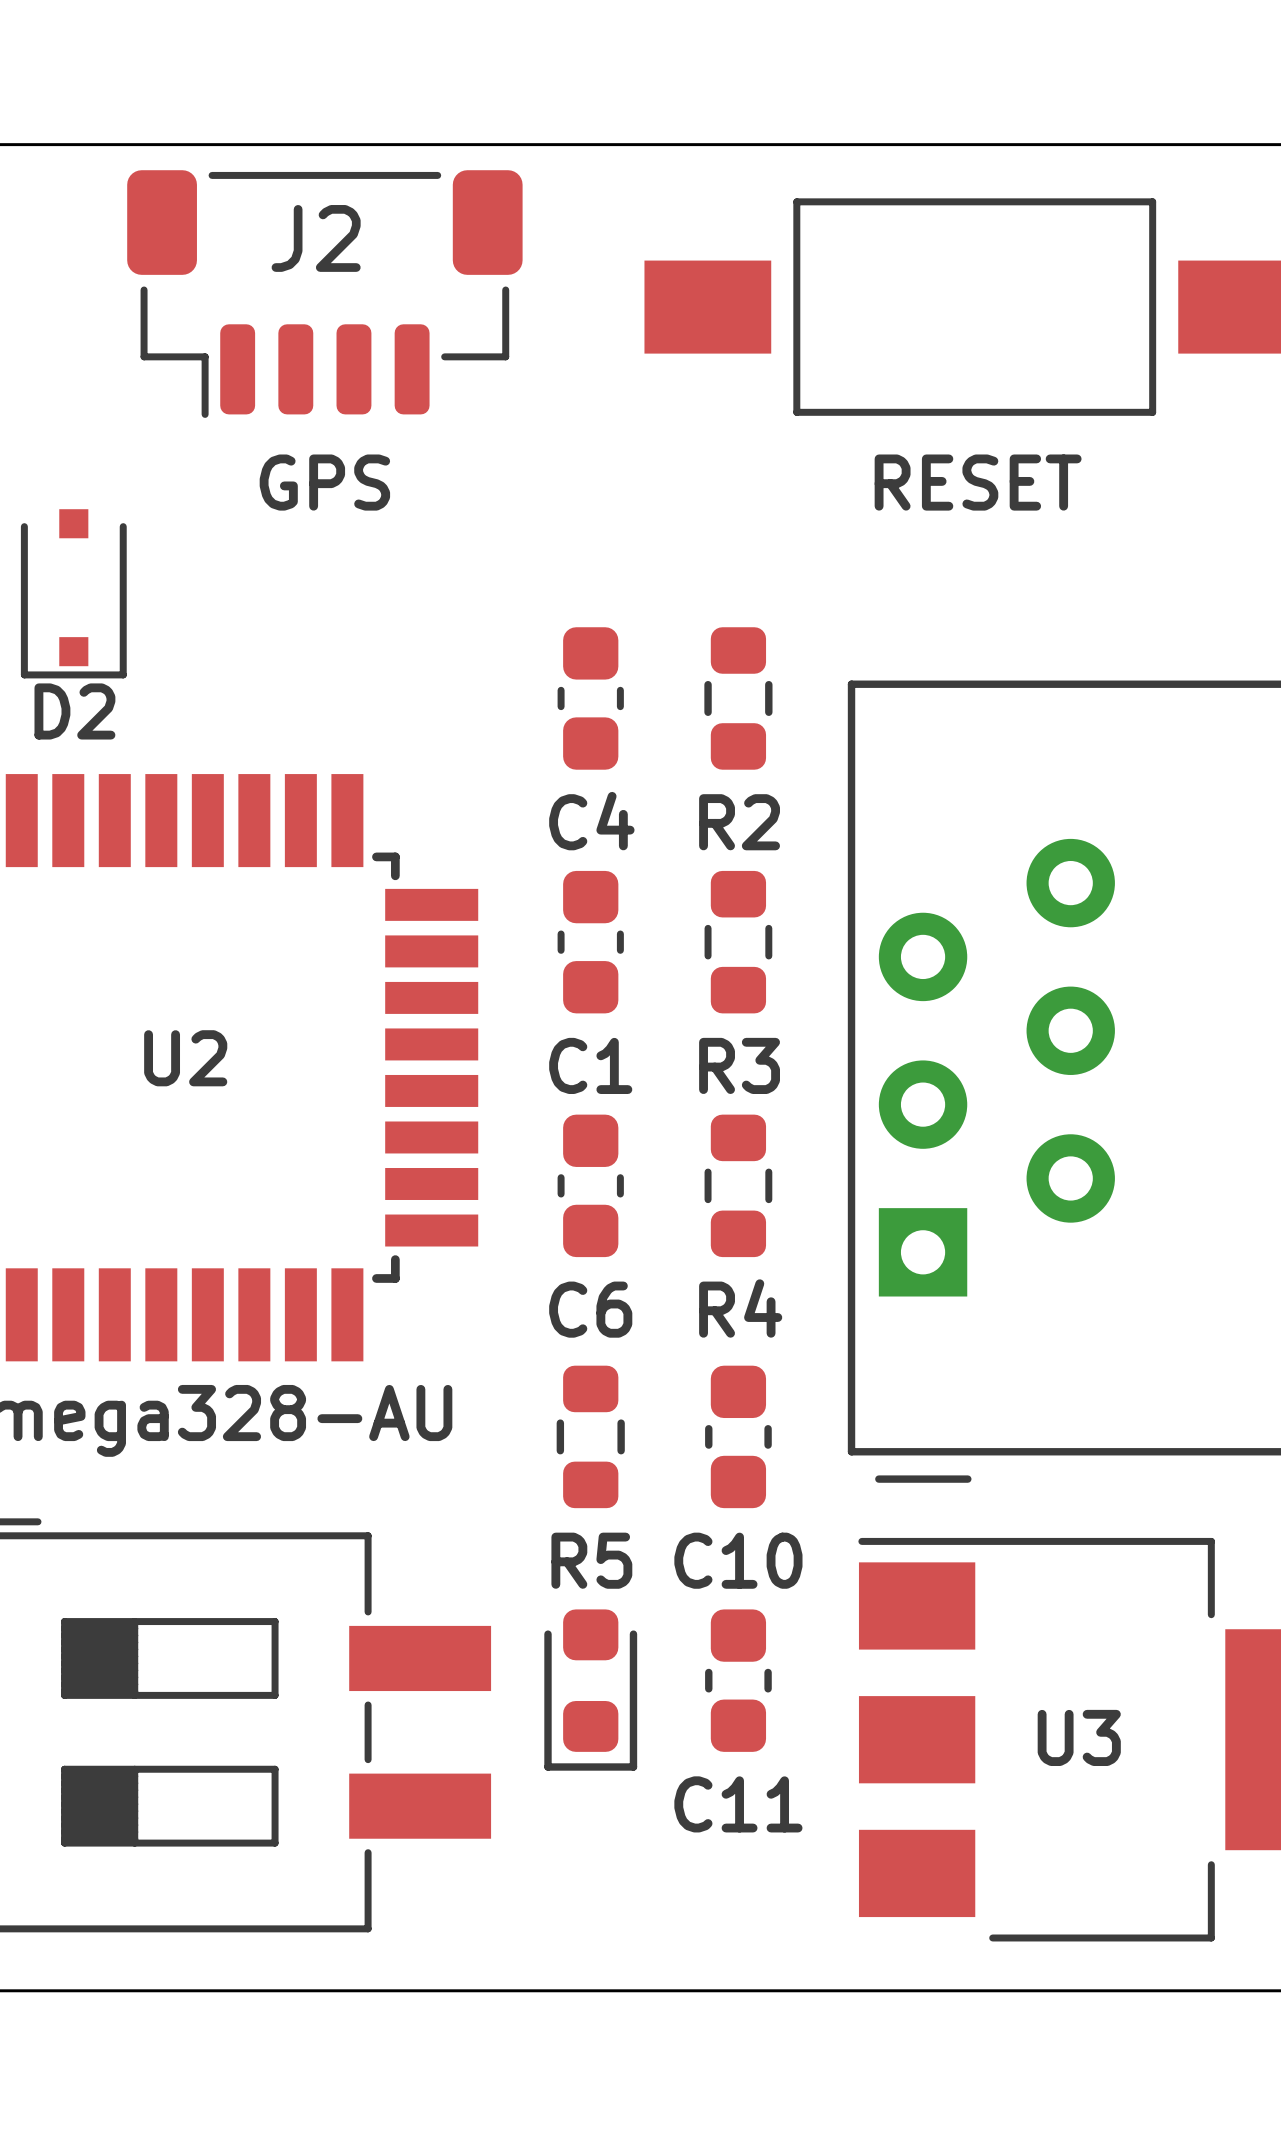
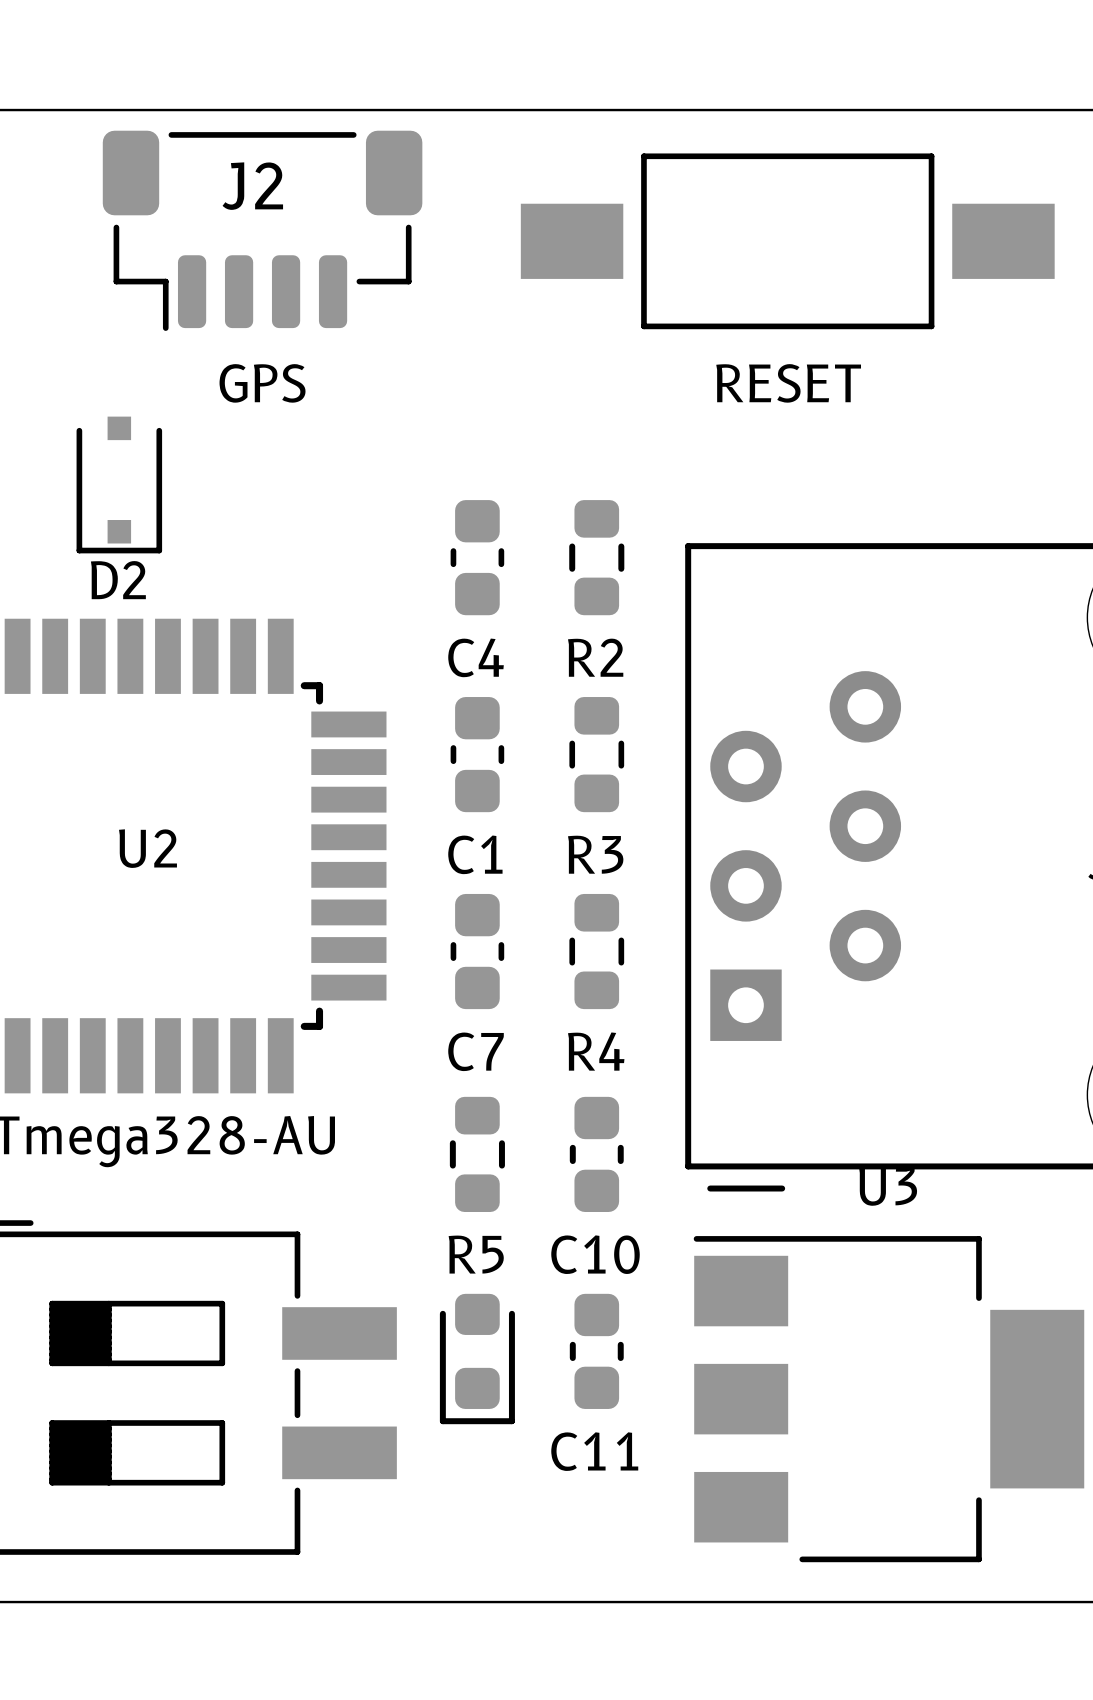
D2 position: (73, 593) -> (119, 484)
C6 name: C6 (590, 1309) -> C7 (476, 1051)
U3 name position: U3 (1079, 1737) -> U3 (888, 1186)

